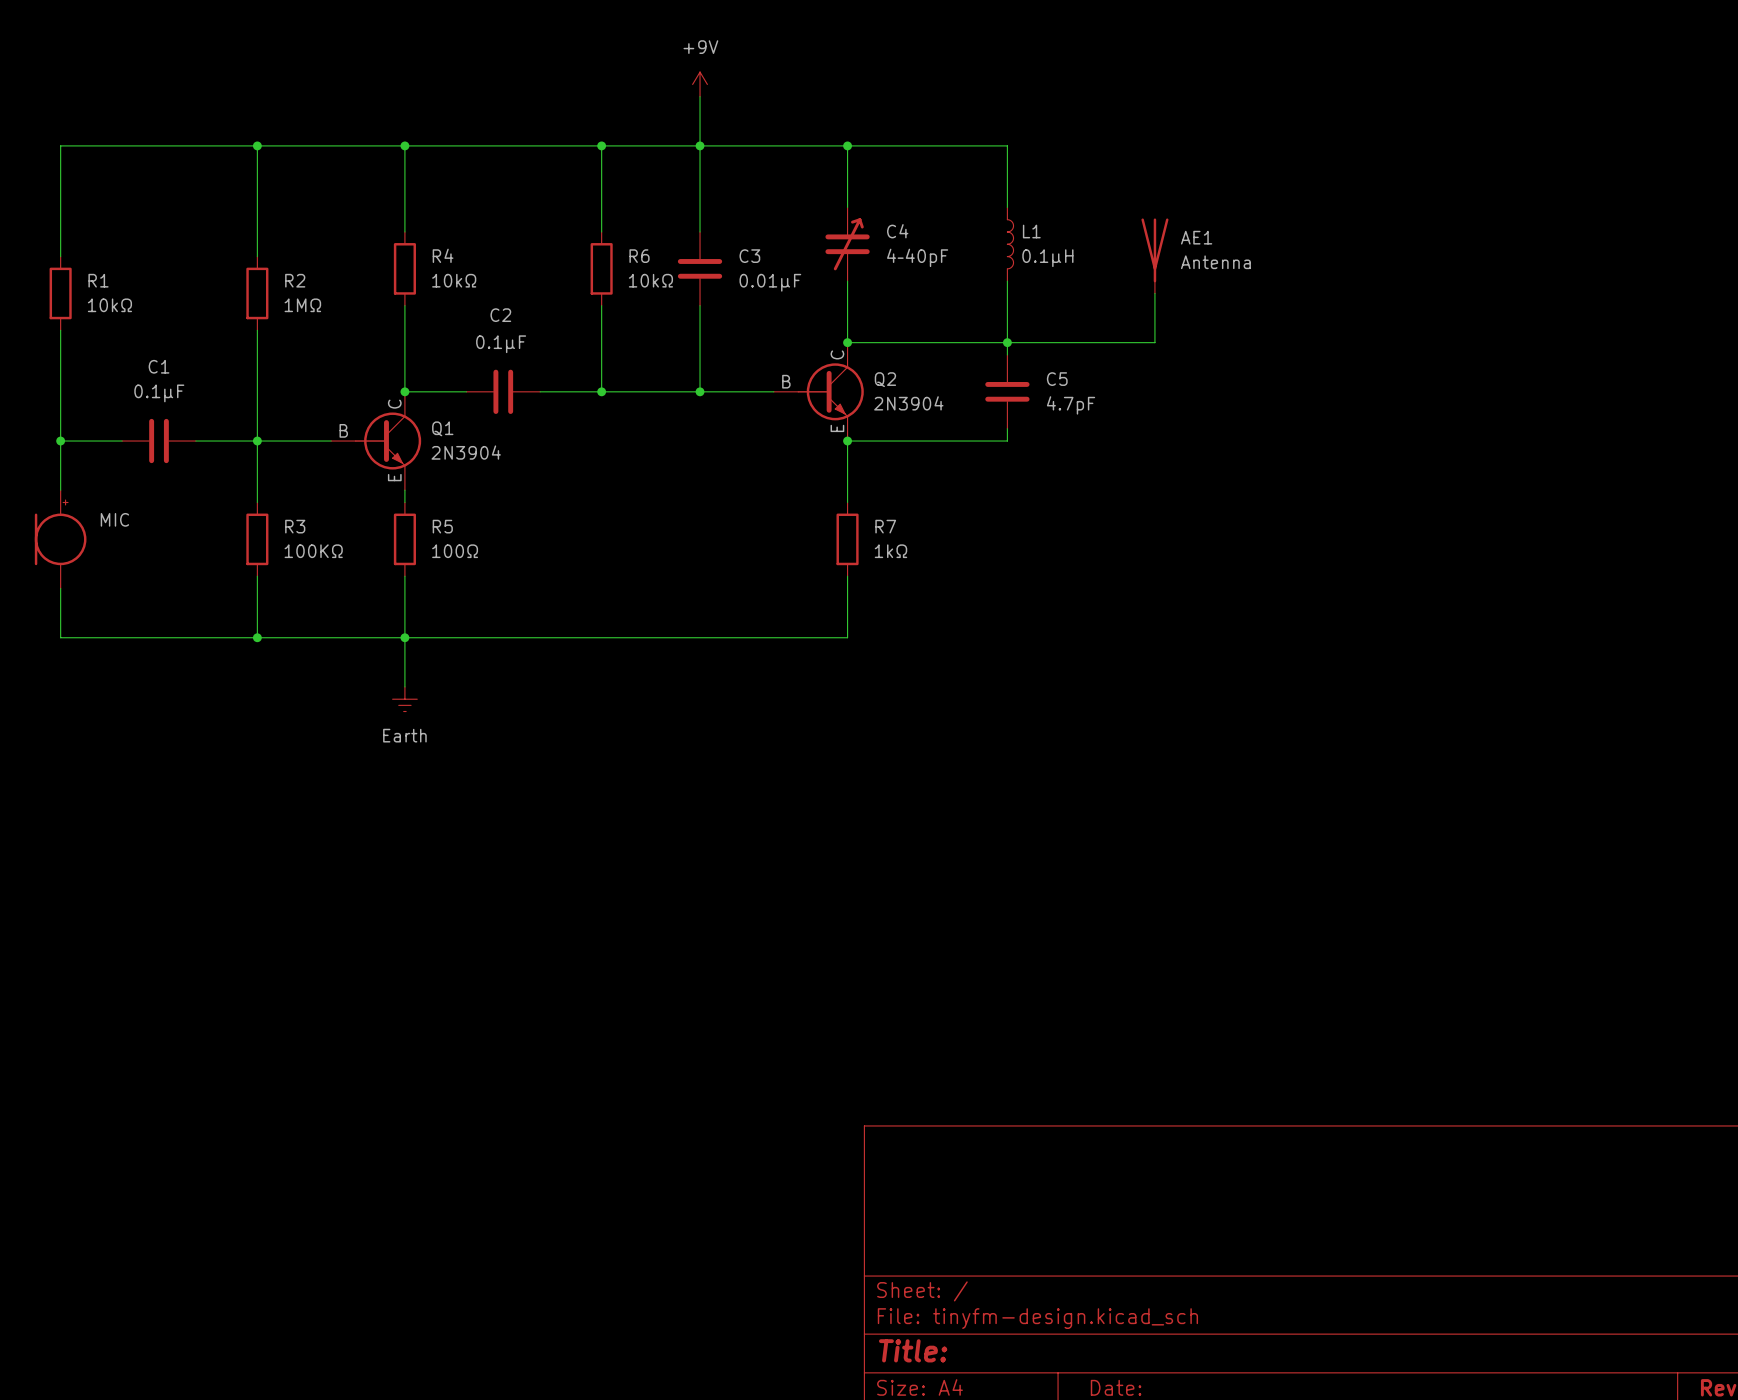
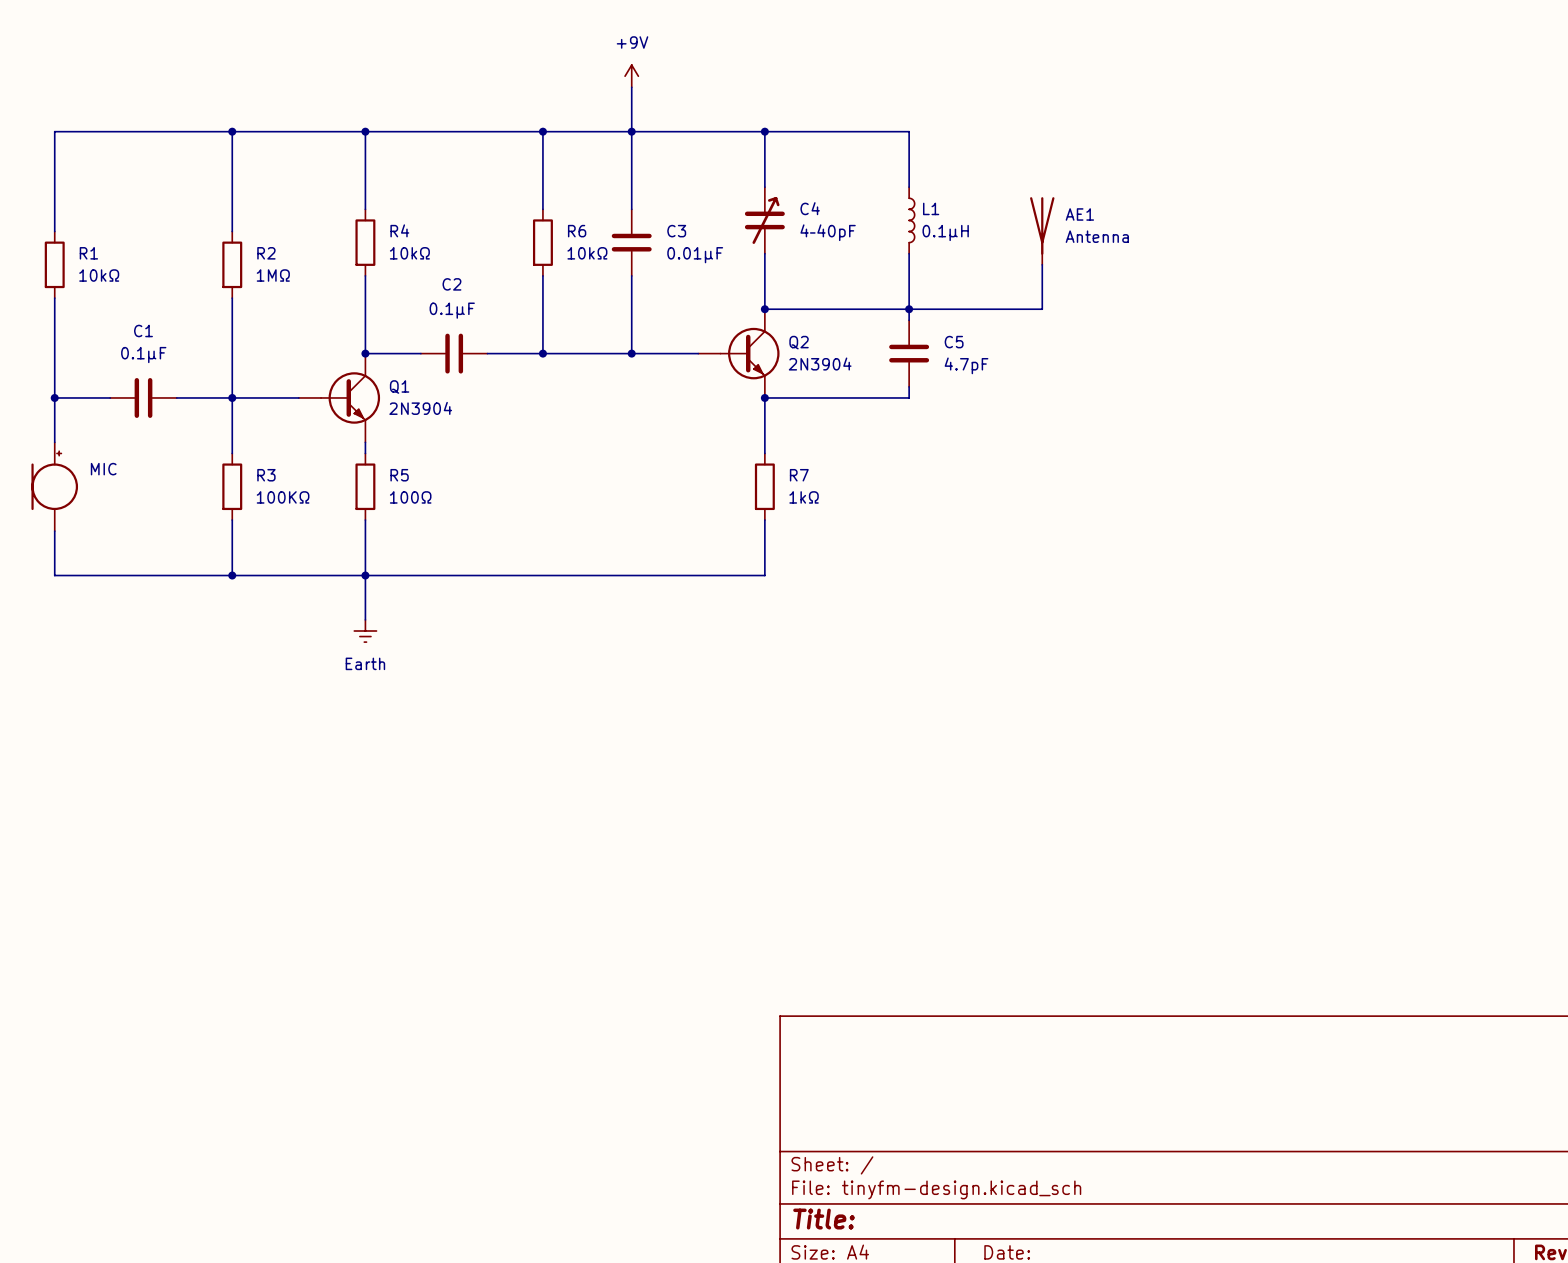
Q2 pin name: C (837, 354) -> none
Q2 pin name: B (786, 381) -> none
Q1 pin name: C (394, 404) -> none
Q2 pin name: E (837, 428) -> none
Q1 pin name: B (343, 430) -> none
Q1 pin name: E (394, 477) -> none

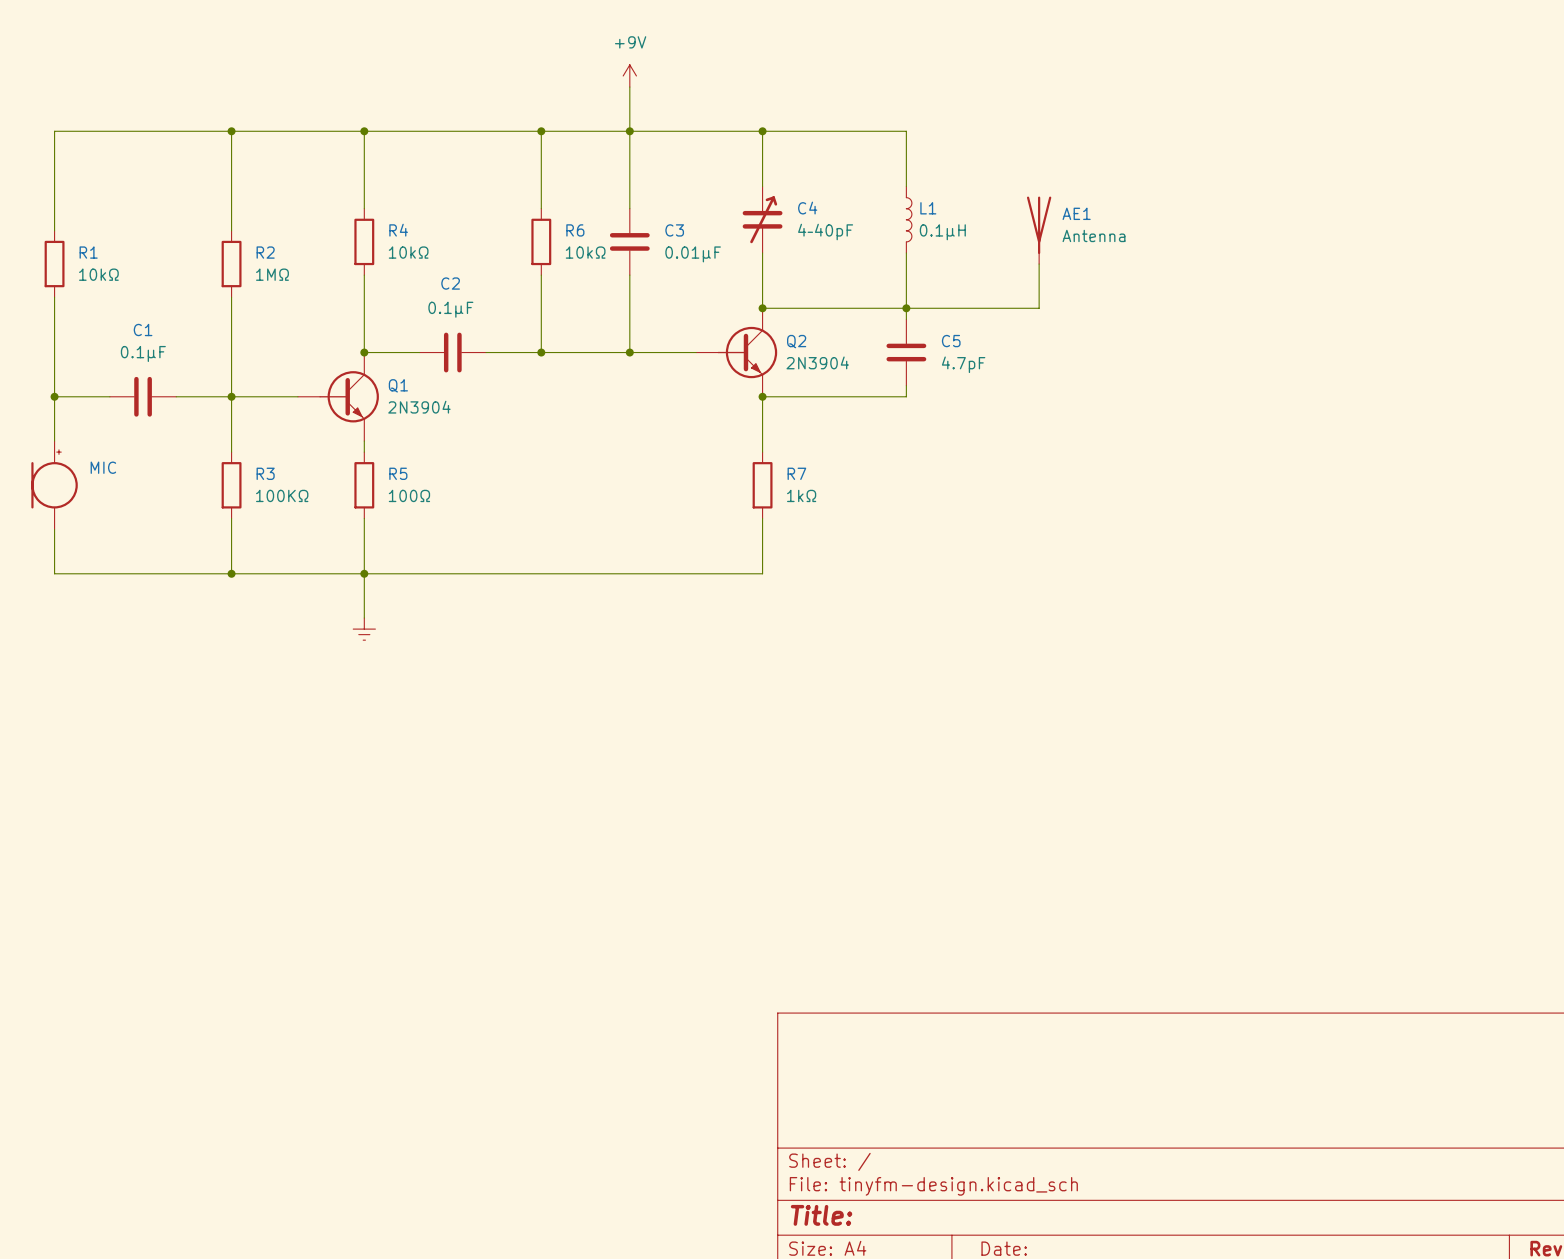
power symbol text: Earth (365, 663) -> none

